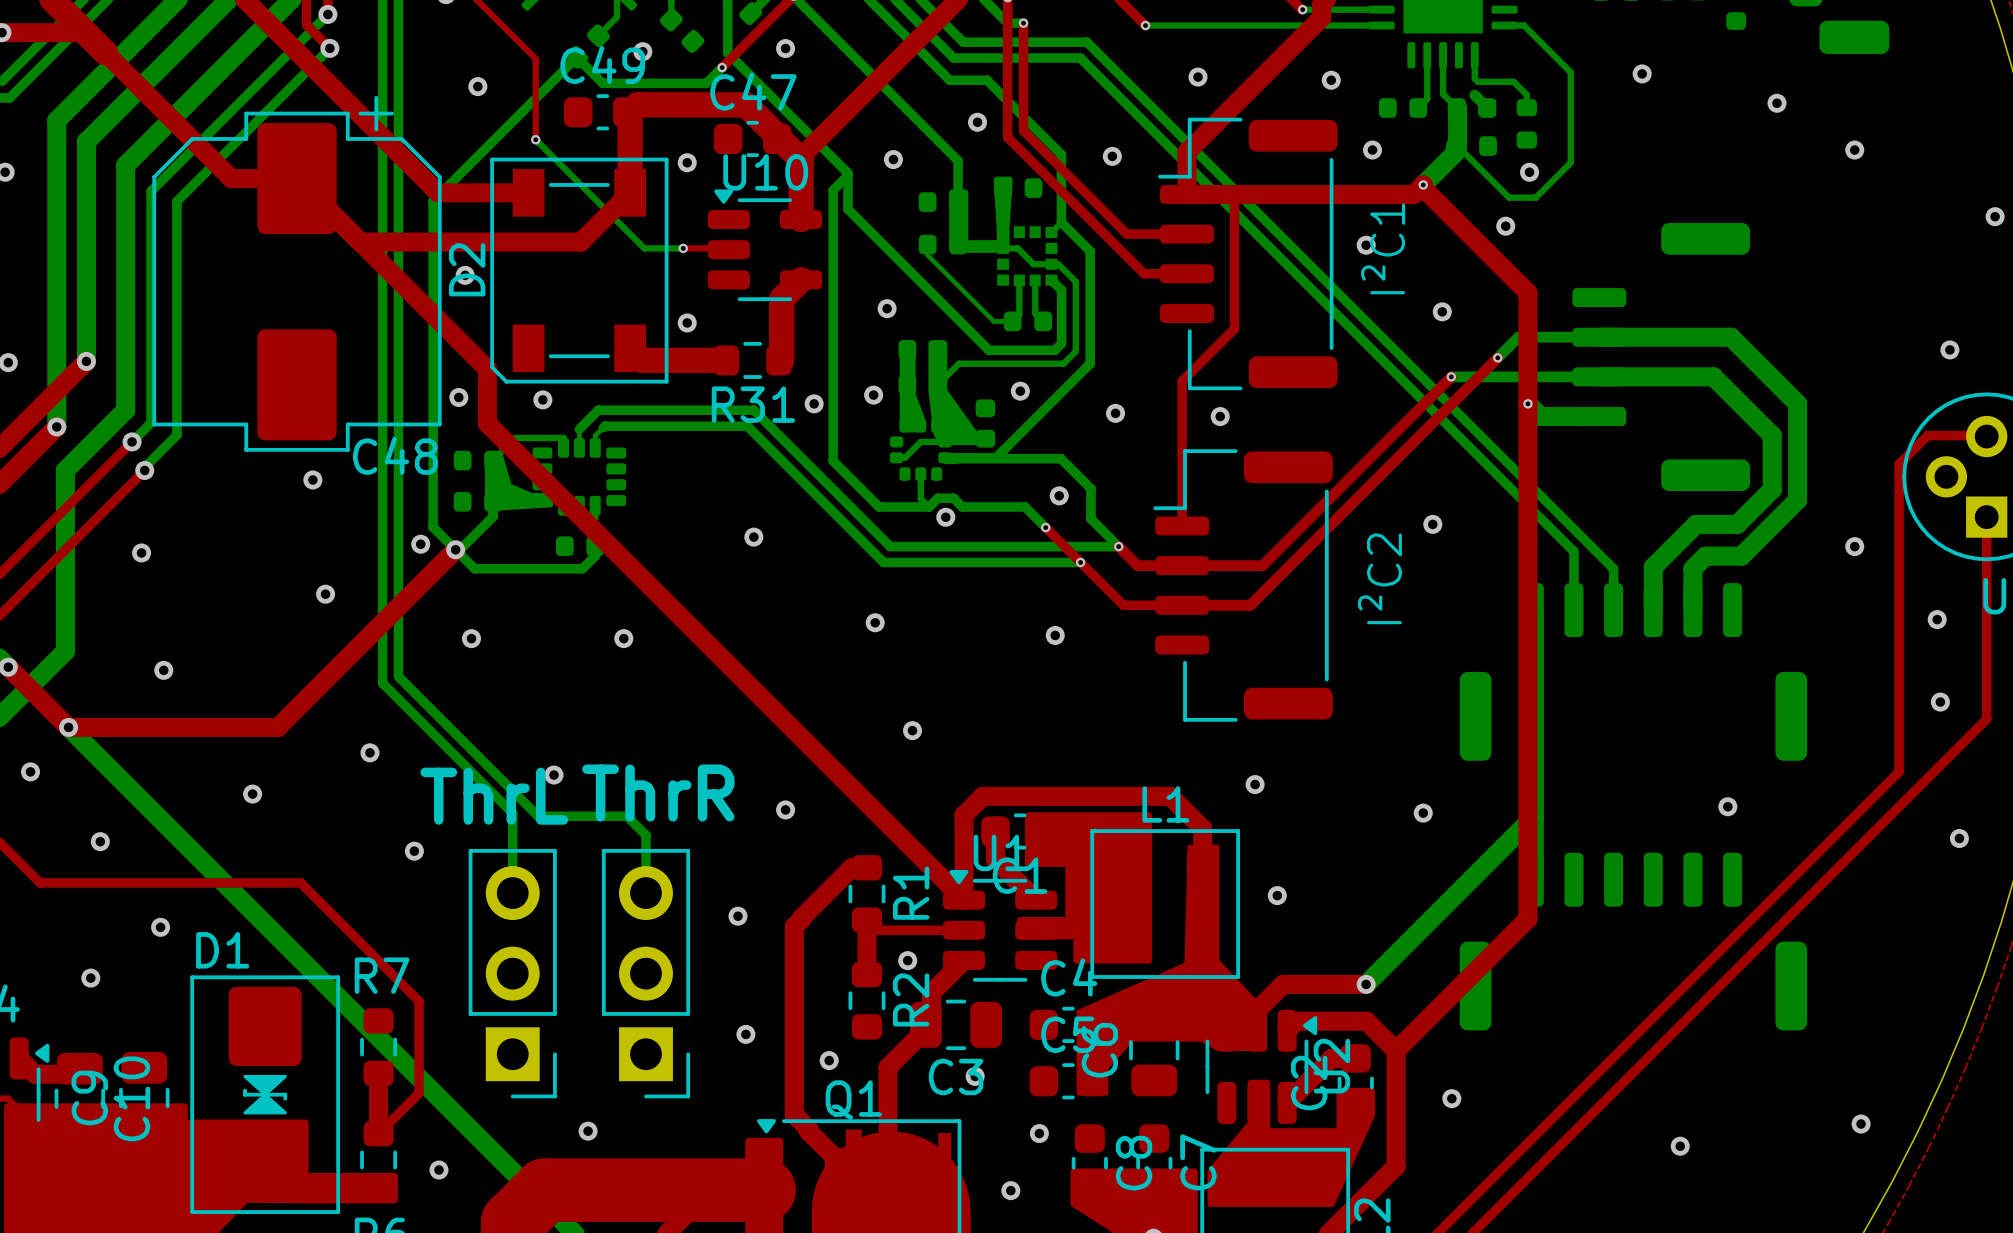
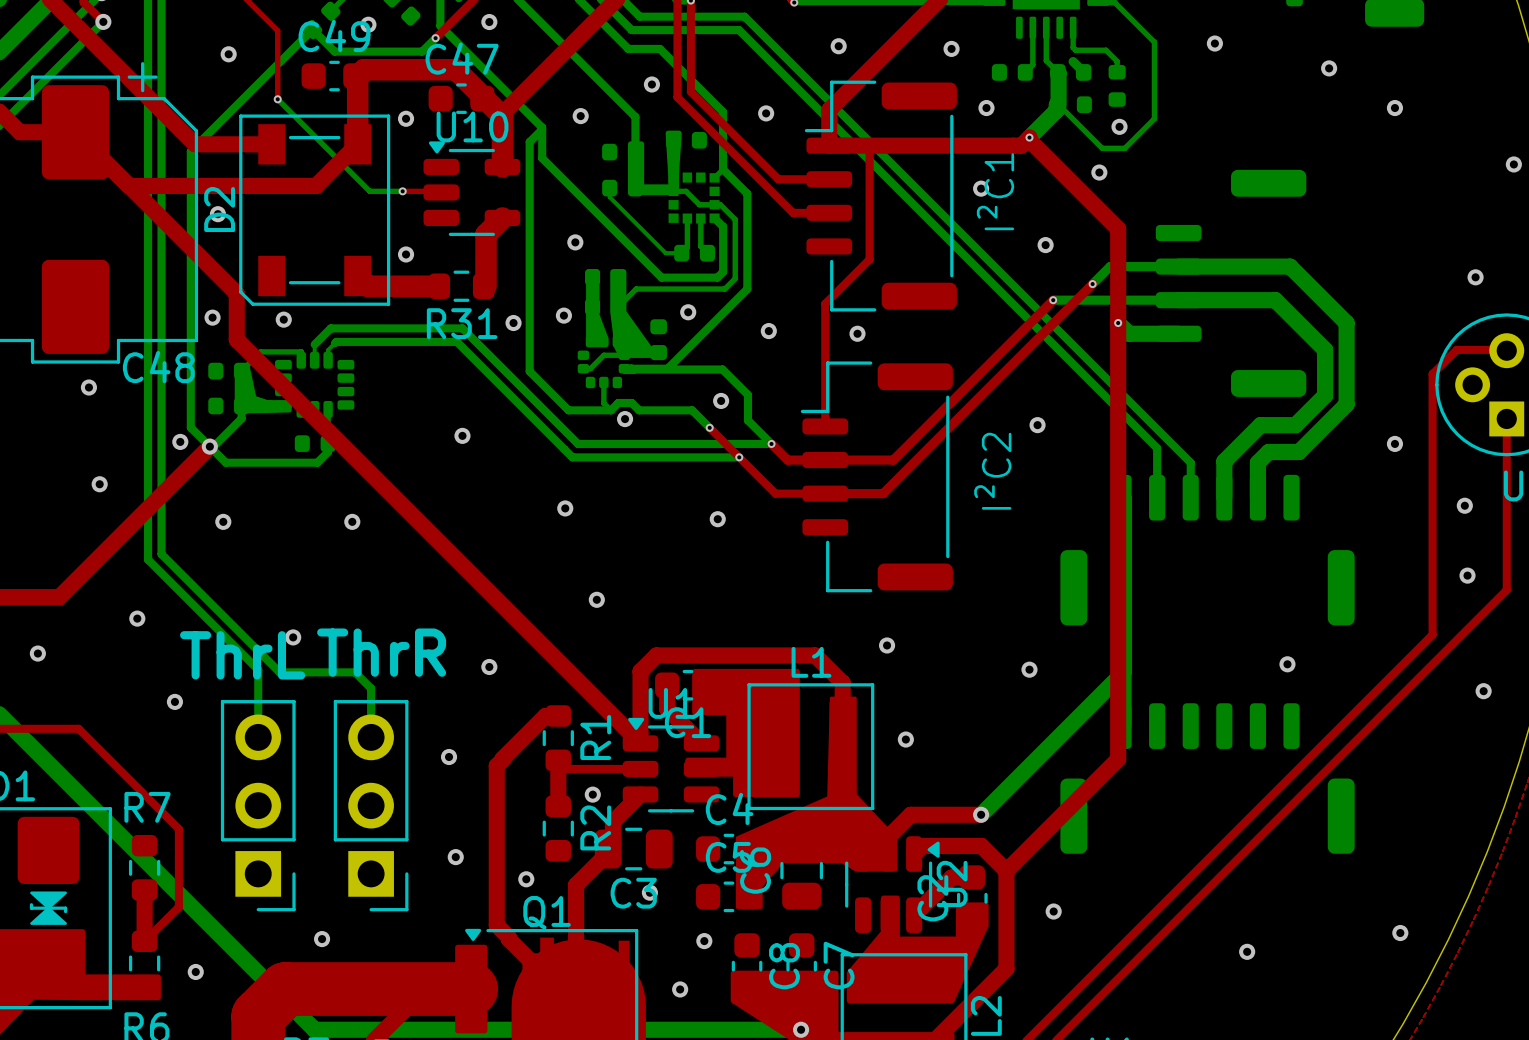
drawing shape: [484, 451, 554, 511] -> [234, 363, 292, 414]

